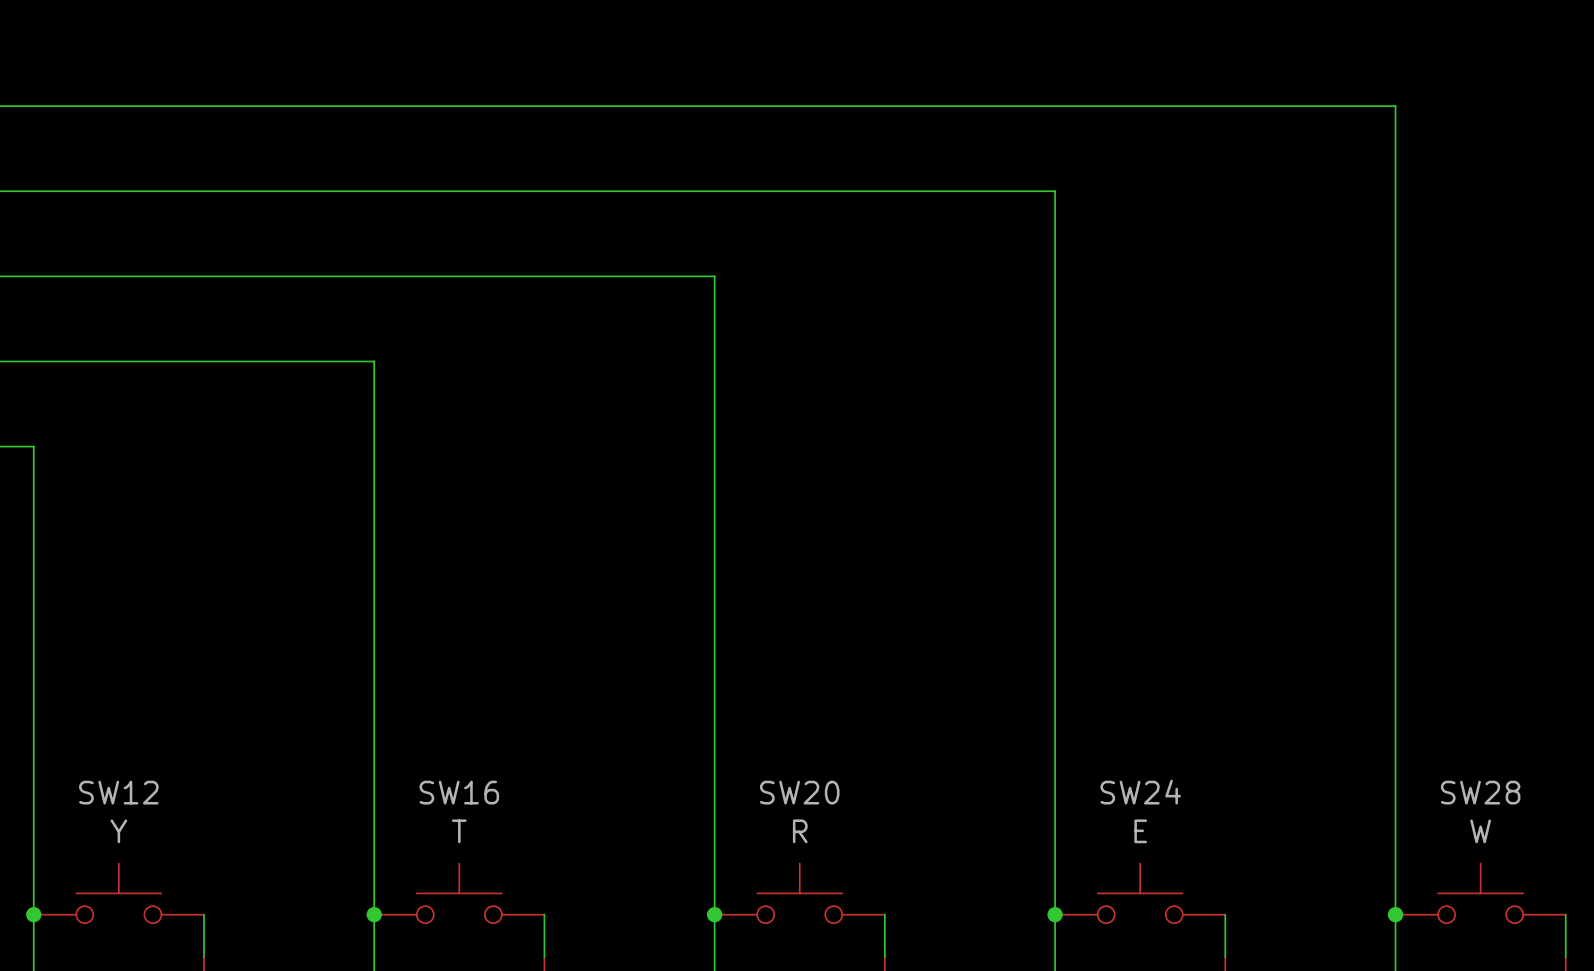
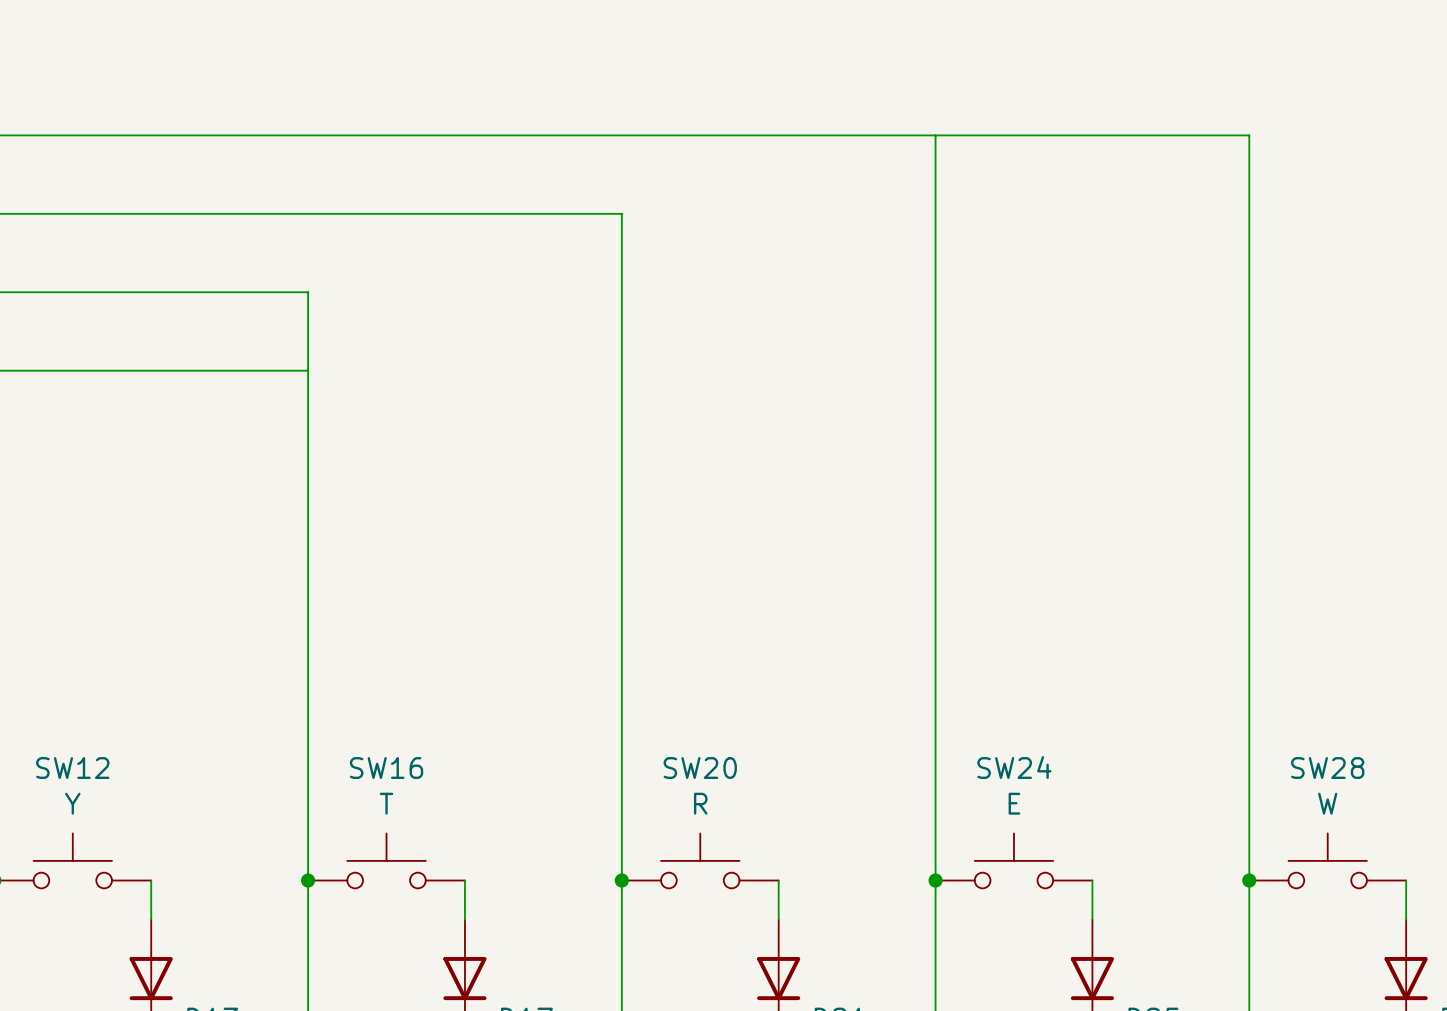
wire: (714, 191) (1055, 191) -> (935, 135) (935, 213)
wire: (374, 276) (714, 276) -> (621, 213) (621, 292)
wire: none -> (308, 292) (308, 370)

